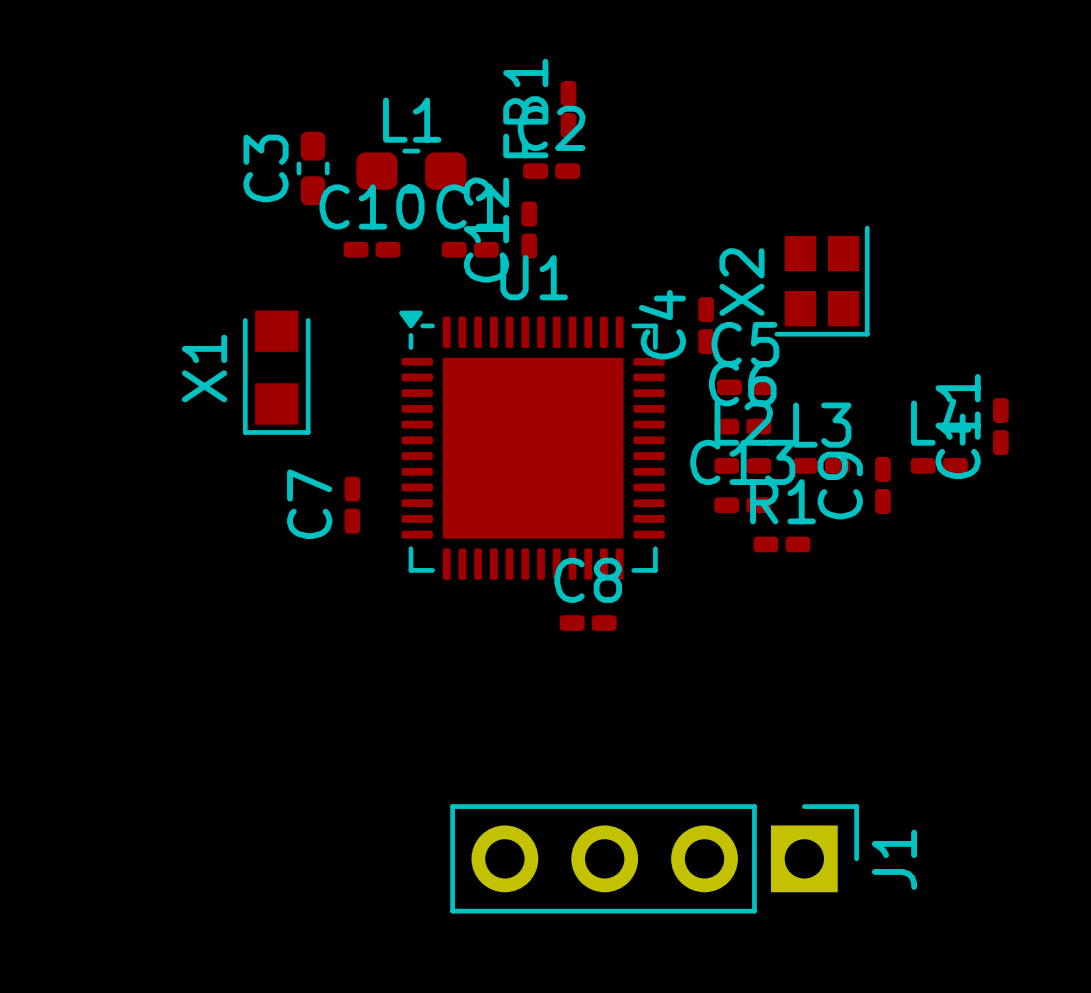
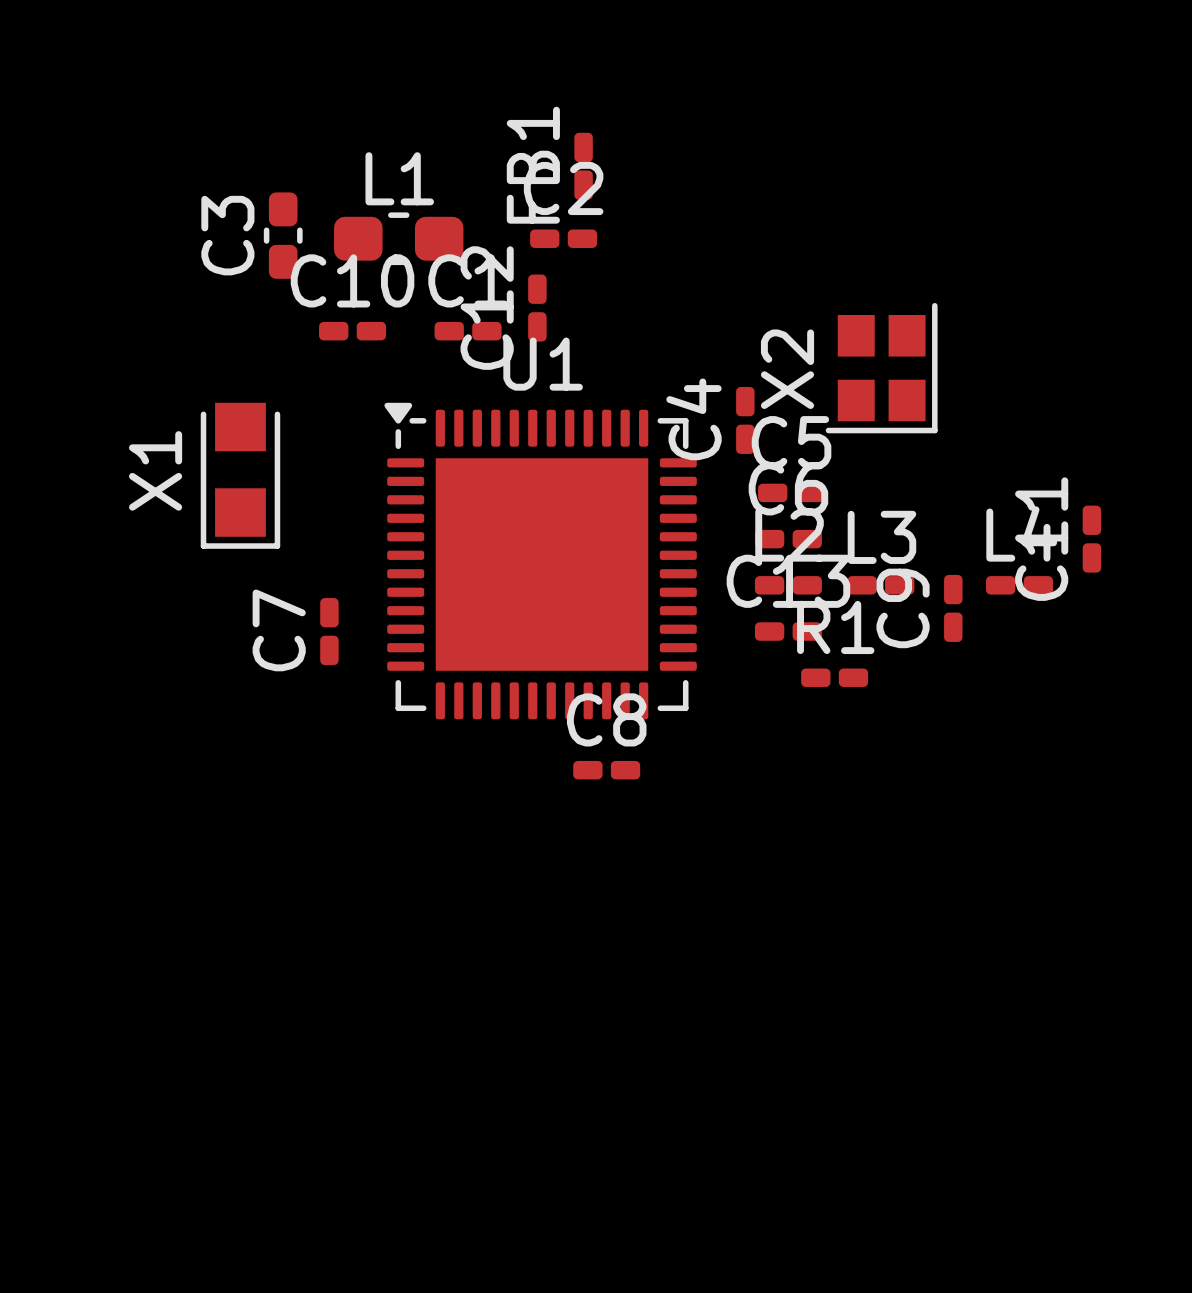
J1: (654, 858) -> none

